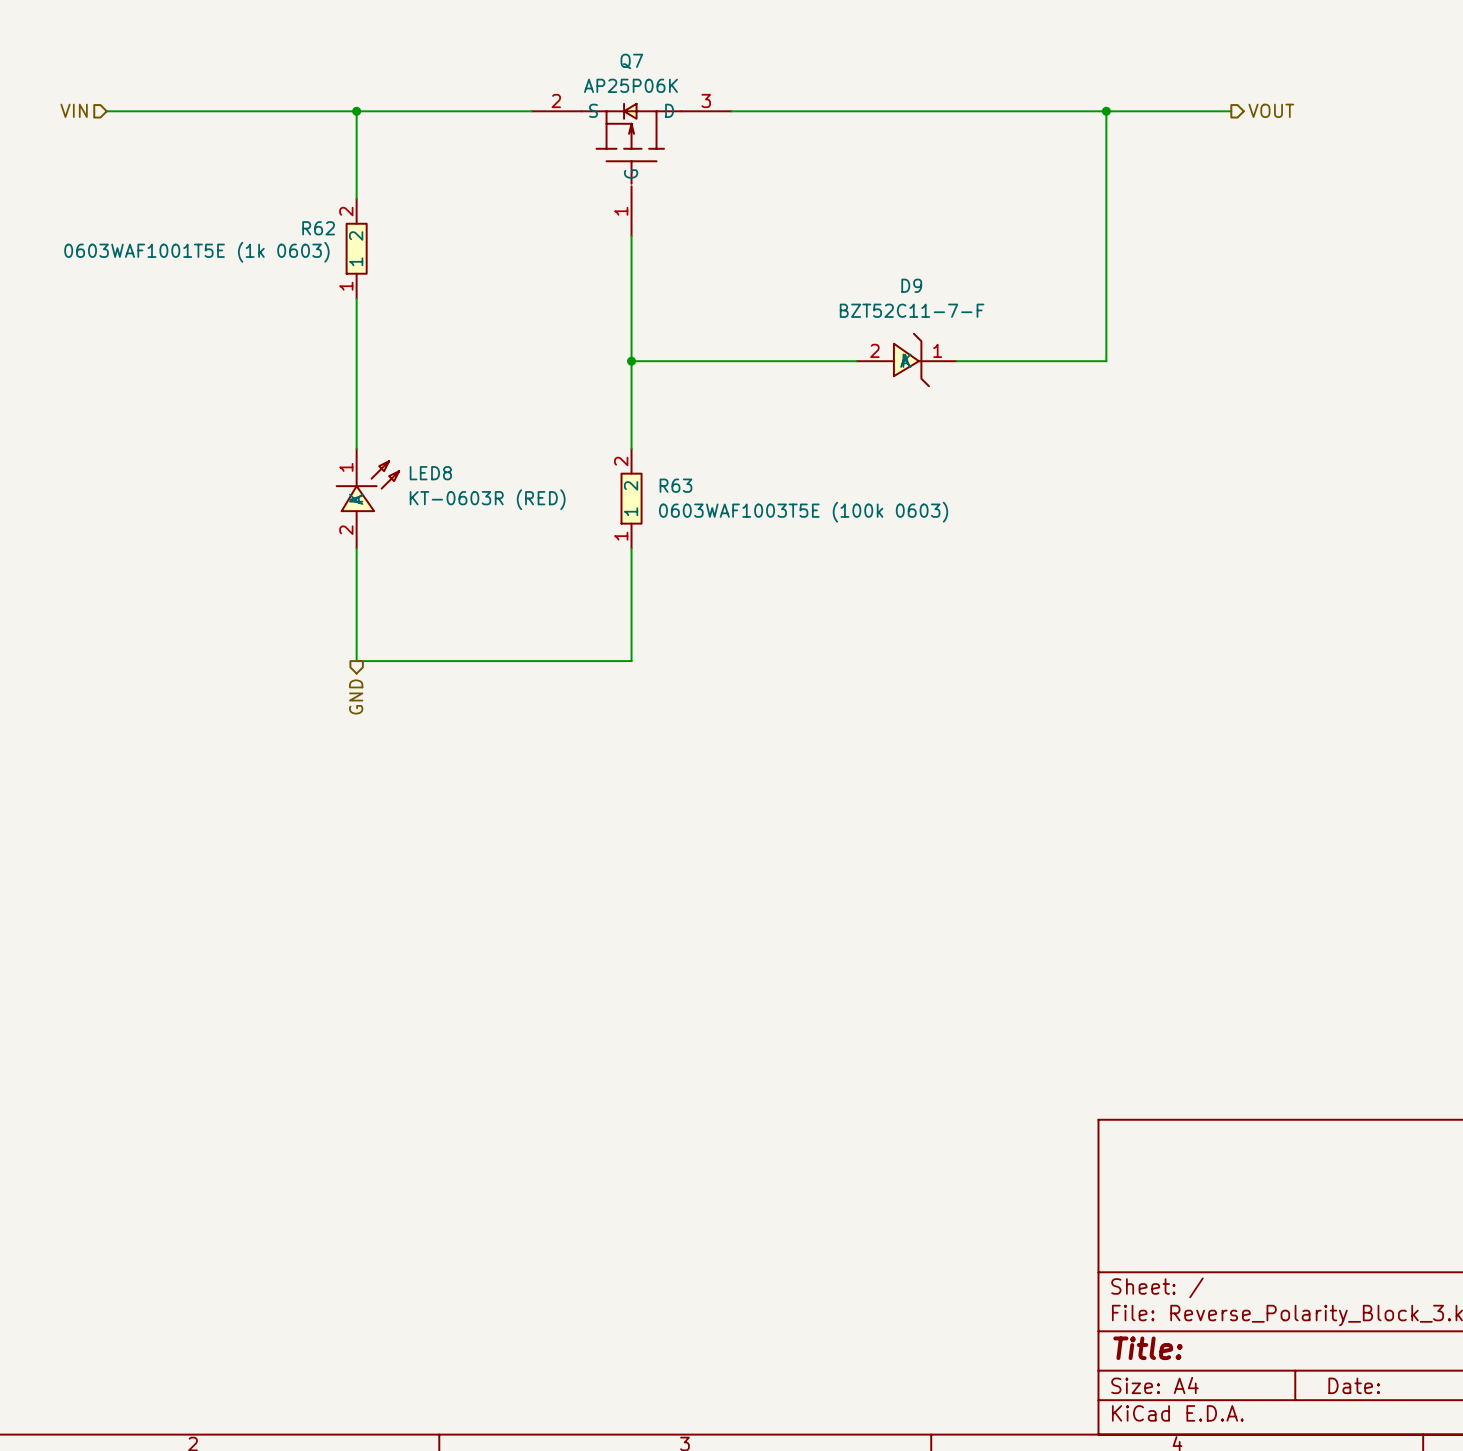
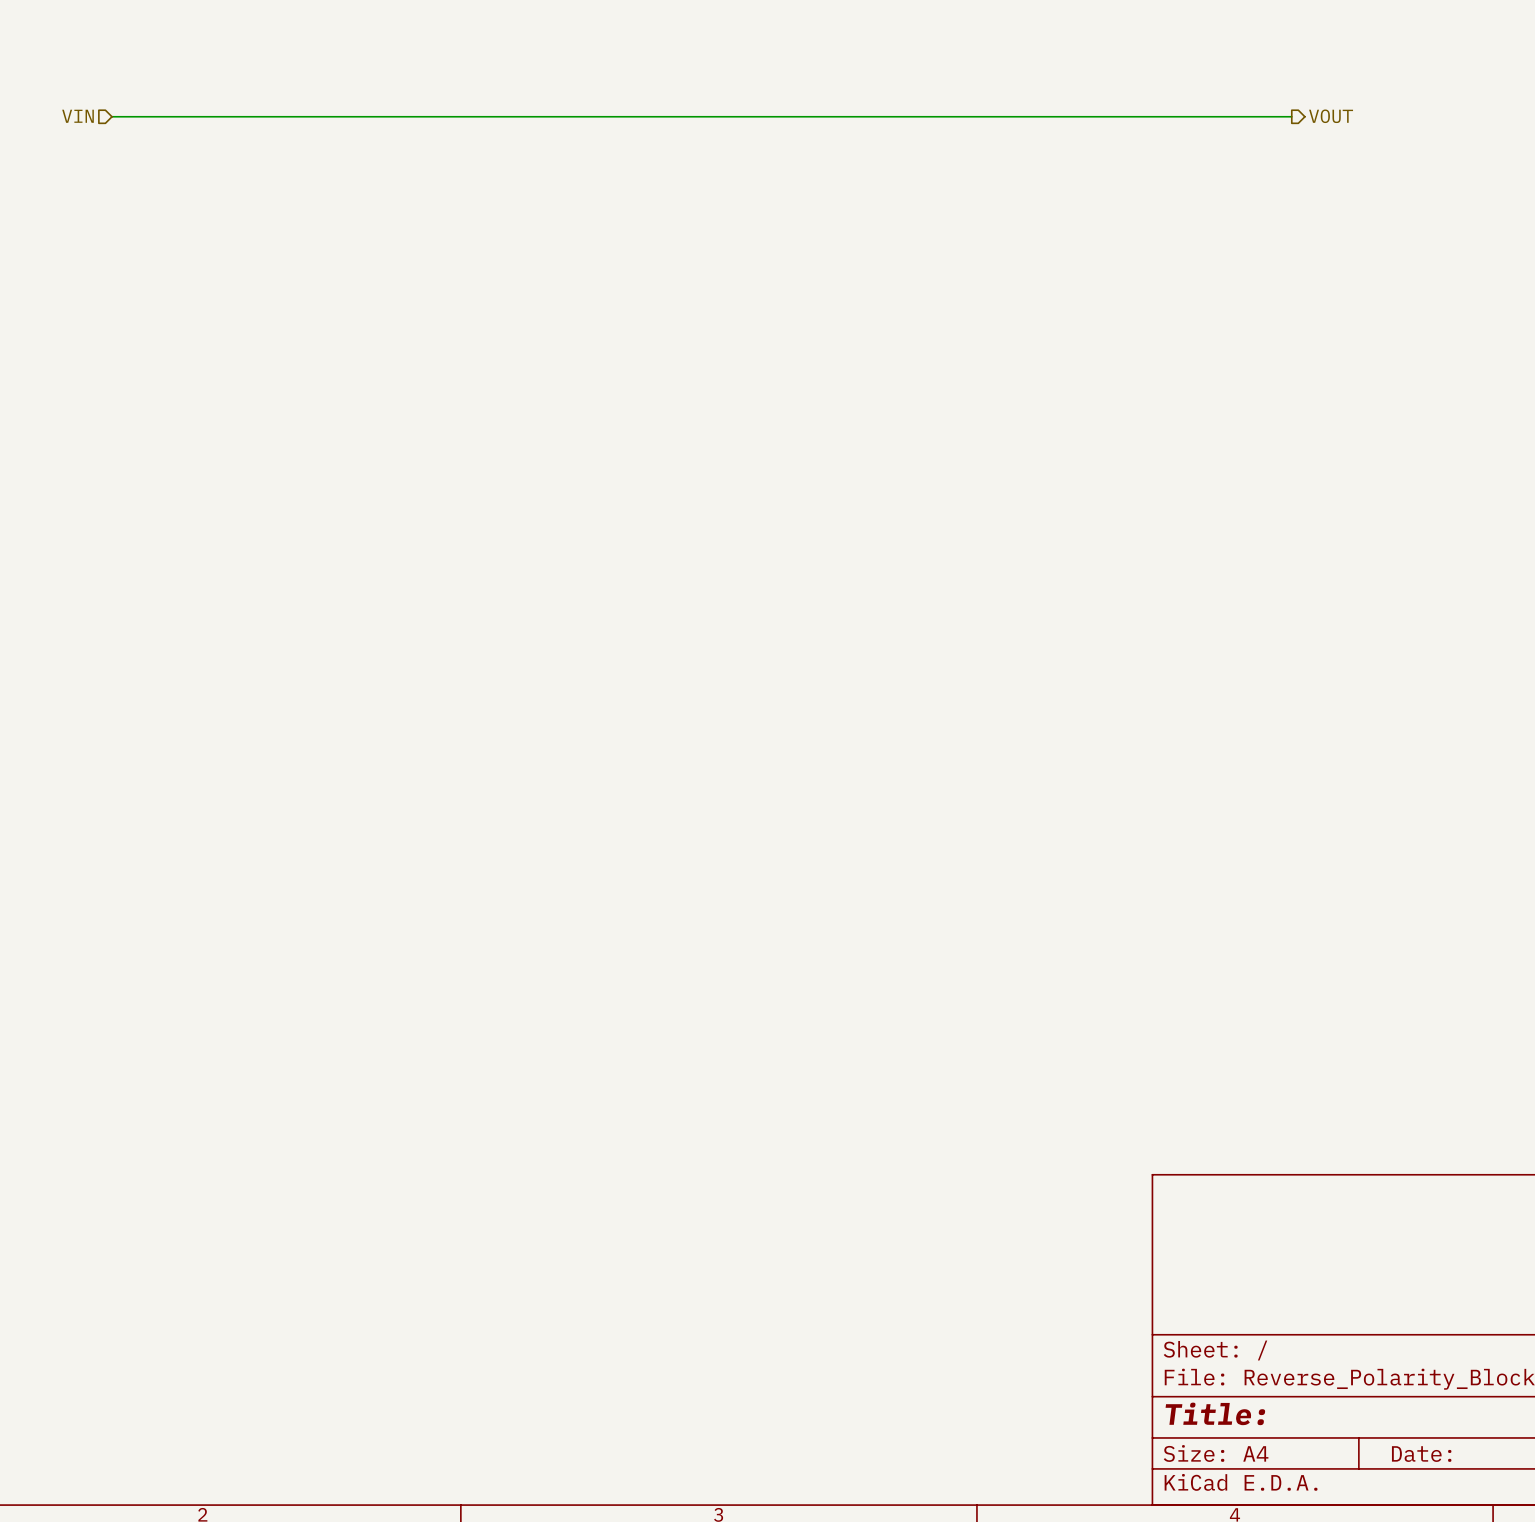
wire: (356, 111) (356, 198) -> none
junction: (356, 111) -> none
wire: (1106, 111) (1106, 361) (956, 361) -> none
junction: (1106, 111) -> none
Q7: AP25P06K (631, 170) -> none
wire: (631, 236) (631, 448) -> none
R62: 0603WAF1001T5E (1k 0603) (356, 248) -> none
wire: (356, 298) (356, 448) -> none
D9: BZT52C11-7-F (906, 359) -> none
wire: (631, 361) (856, 361) -> none
junction: (631, 361) -> none
LED8: KT-0603R (RED) (367, 498) -> none
R63: 0603WAF1003T5E (100k 0603) (631, 498) -> none
wire: (356, 548) (356, 661) (631, 661) (631, 548) -> none
hierarchical label: GND (356, 696) -> none

